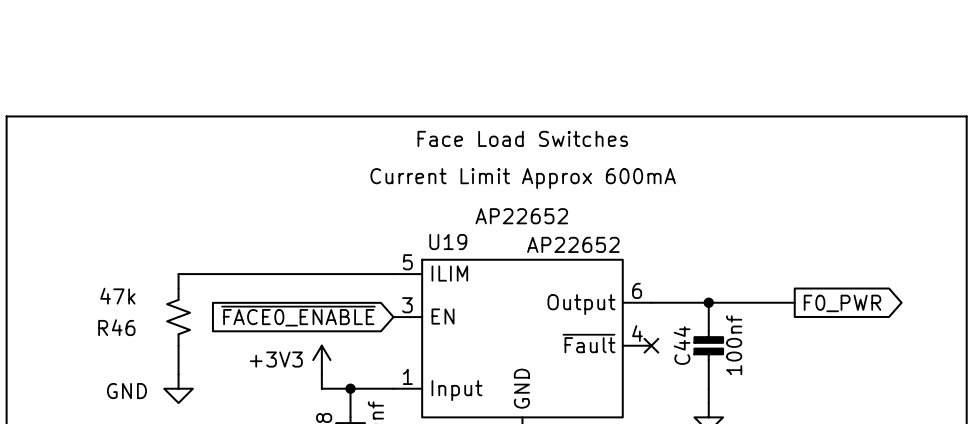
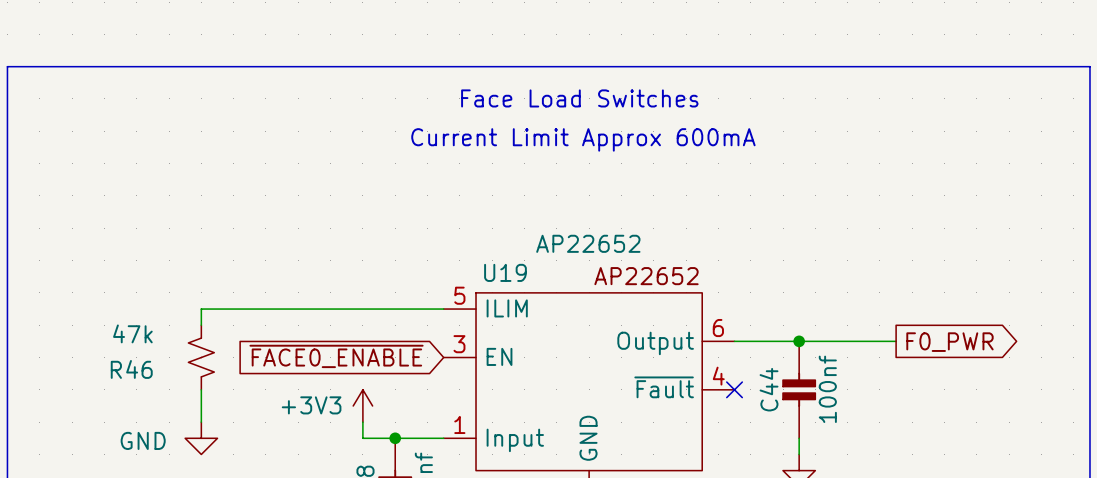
line: (6, 116) (966, 116) -> (7, 131) (7, 66) (1089, 66) (1089, 131)
text position: Face Load Switches (522, 138) -> Face Load Switches (579, 98)
text position: Current Limit Approx 600mA (523, 178) -> Current Limit Approx 600mA (583, 139)

